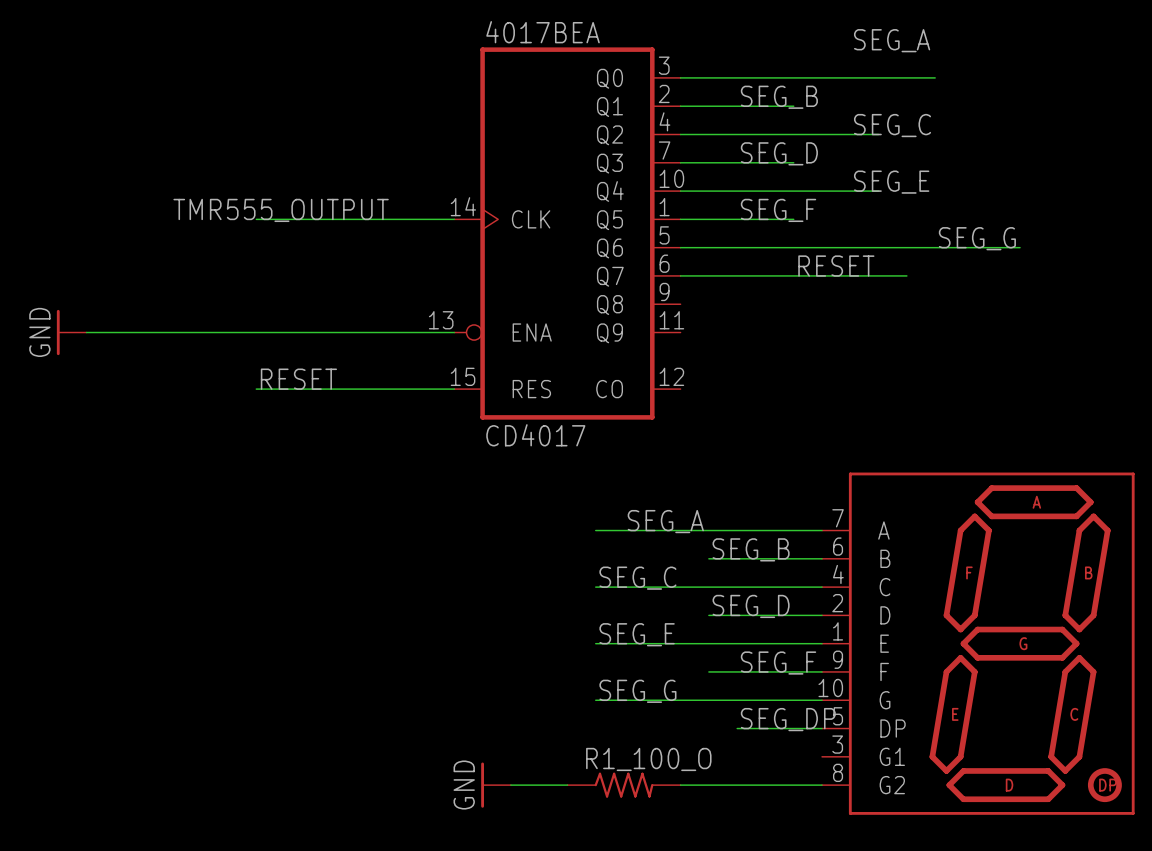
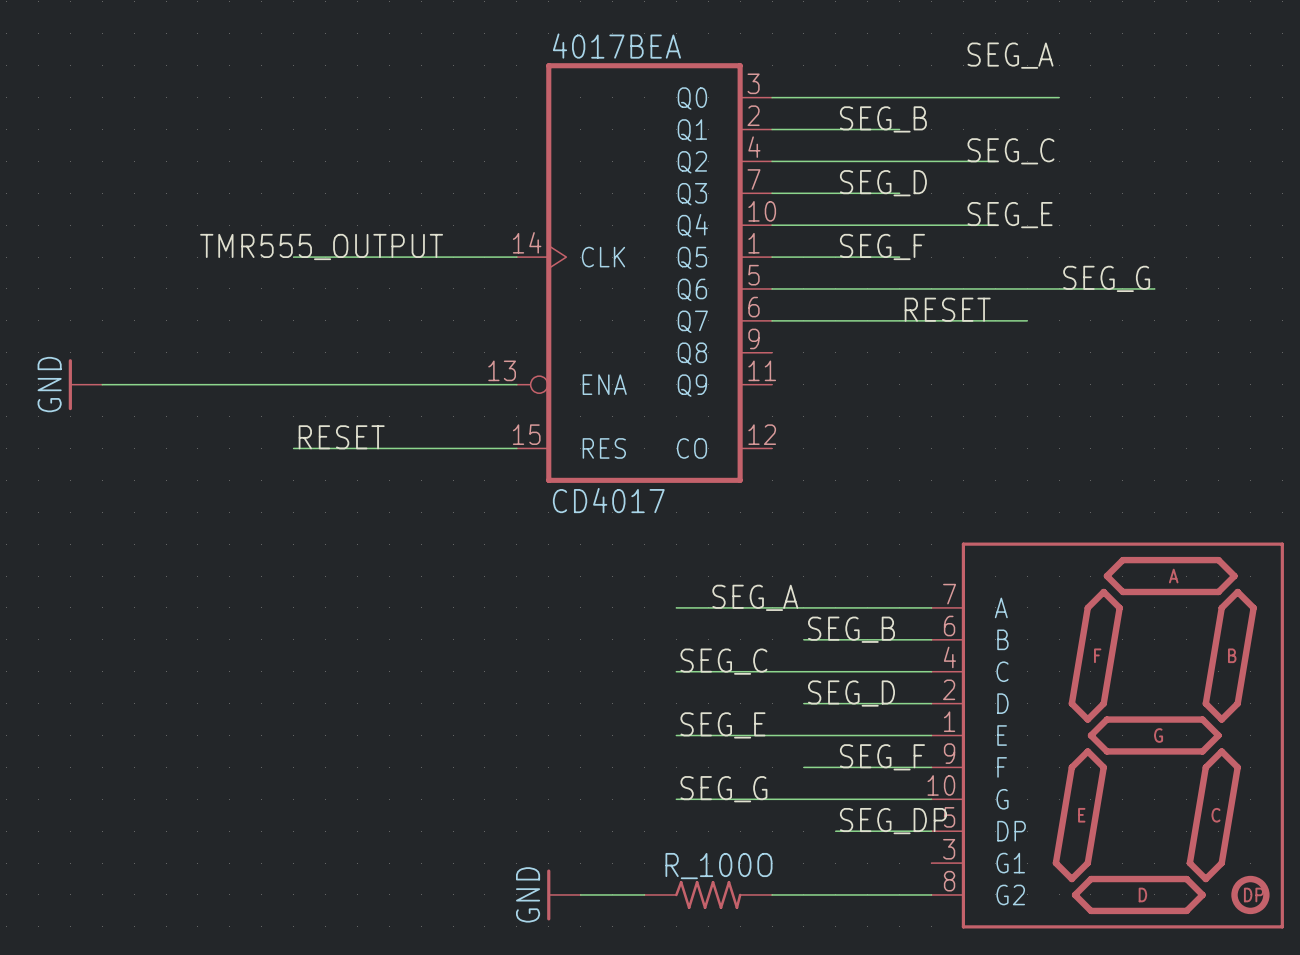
R1_100_O name: R1_100_O (648, 759) -> R_100O (718, 866)

